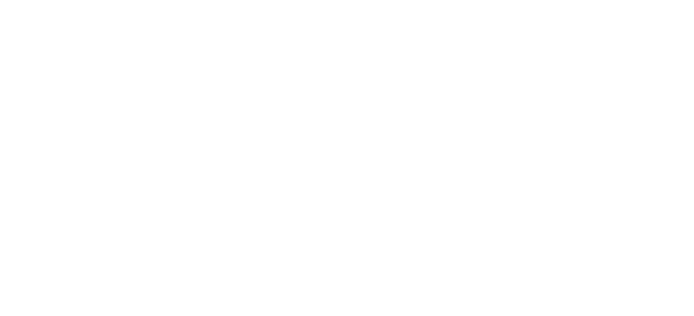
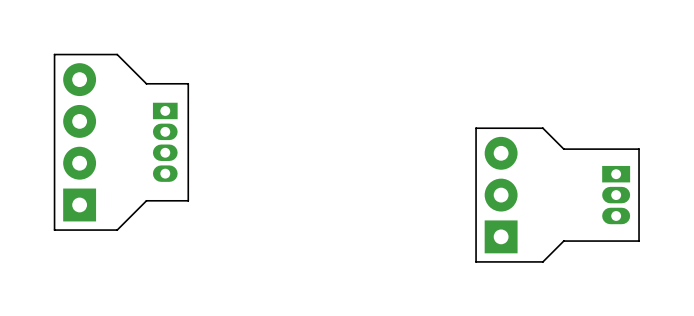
board edge: none -> (117, 54) (146, 83) (188, 83) (188, 200) (146, 200) (117, 230) (54, 230) (54, 54) (117, 54)
board edge: none -> (542, 128) (563, 149) (639, 149) (639, 241) (563, 241) (542, 261) (476, 261) (476, 128) (542, 128)
part: none -> (79, 142)
part: none -> (165, 142)
part: none -> (501, 195)
part: none -> (616, 195)

